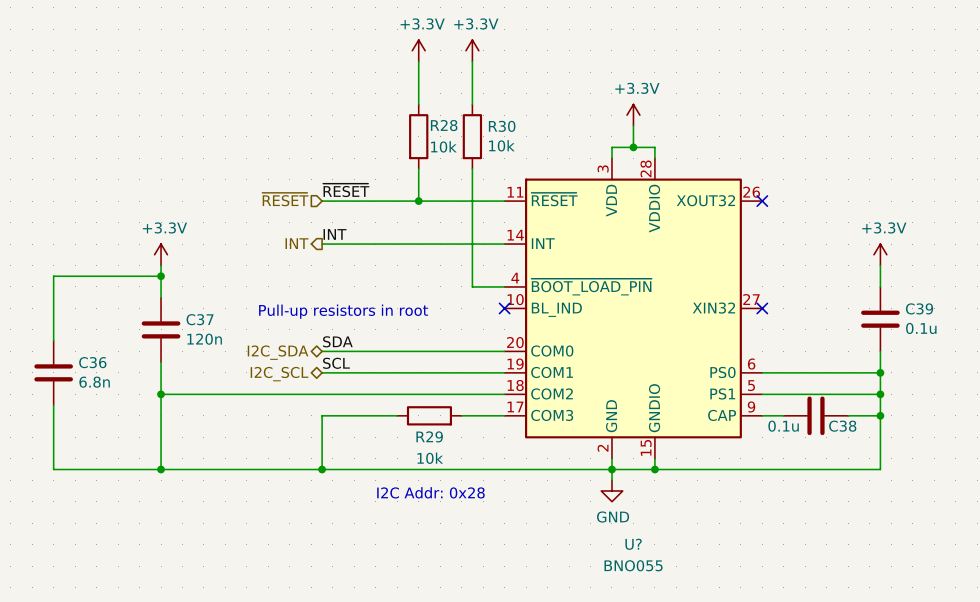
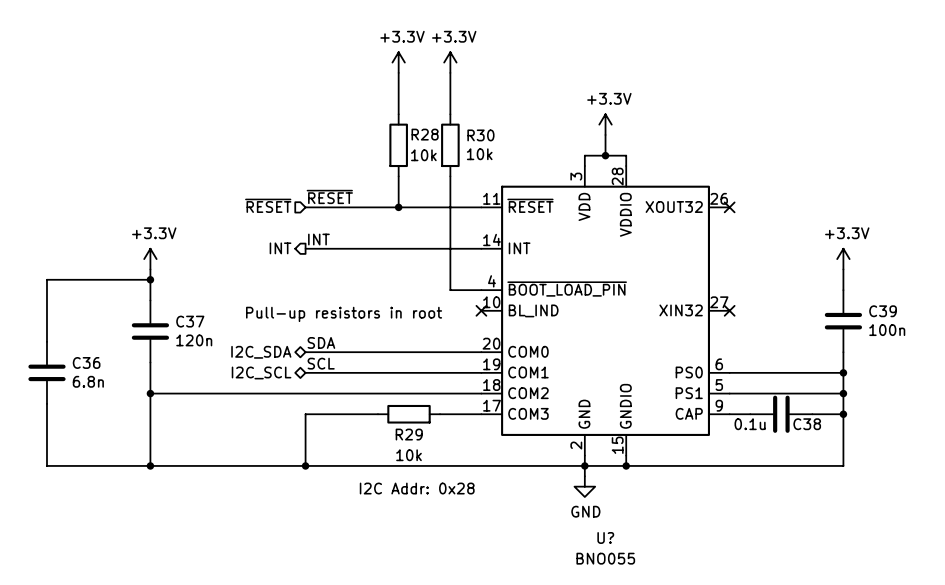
C39 value: 0.1u (921, 328) -> 100n (887, 330)

